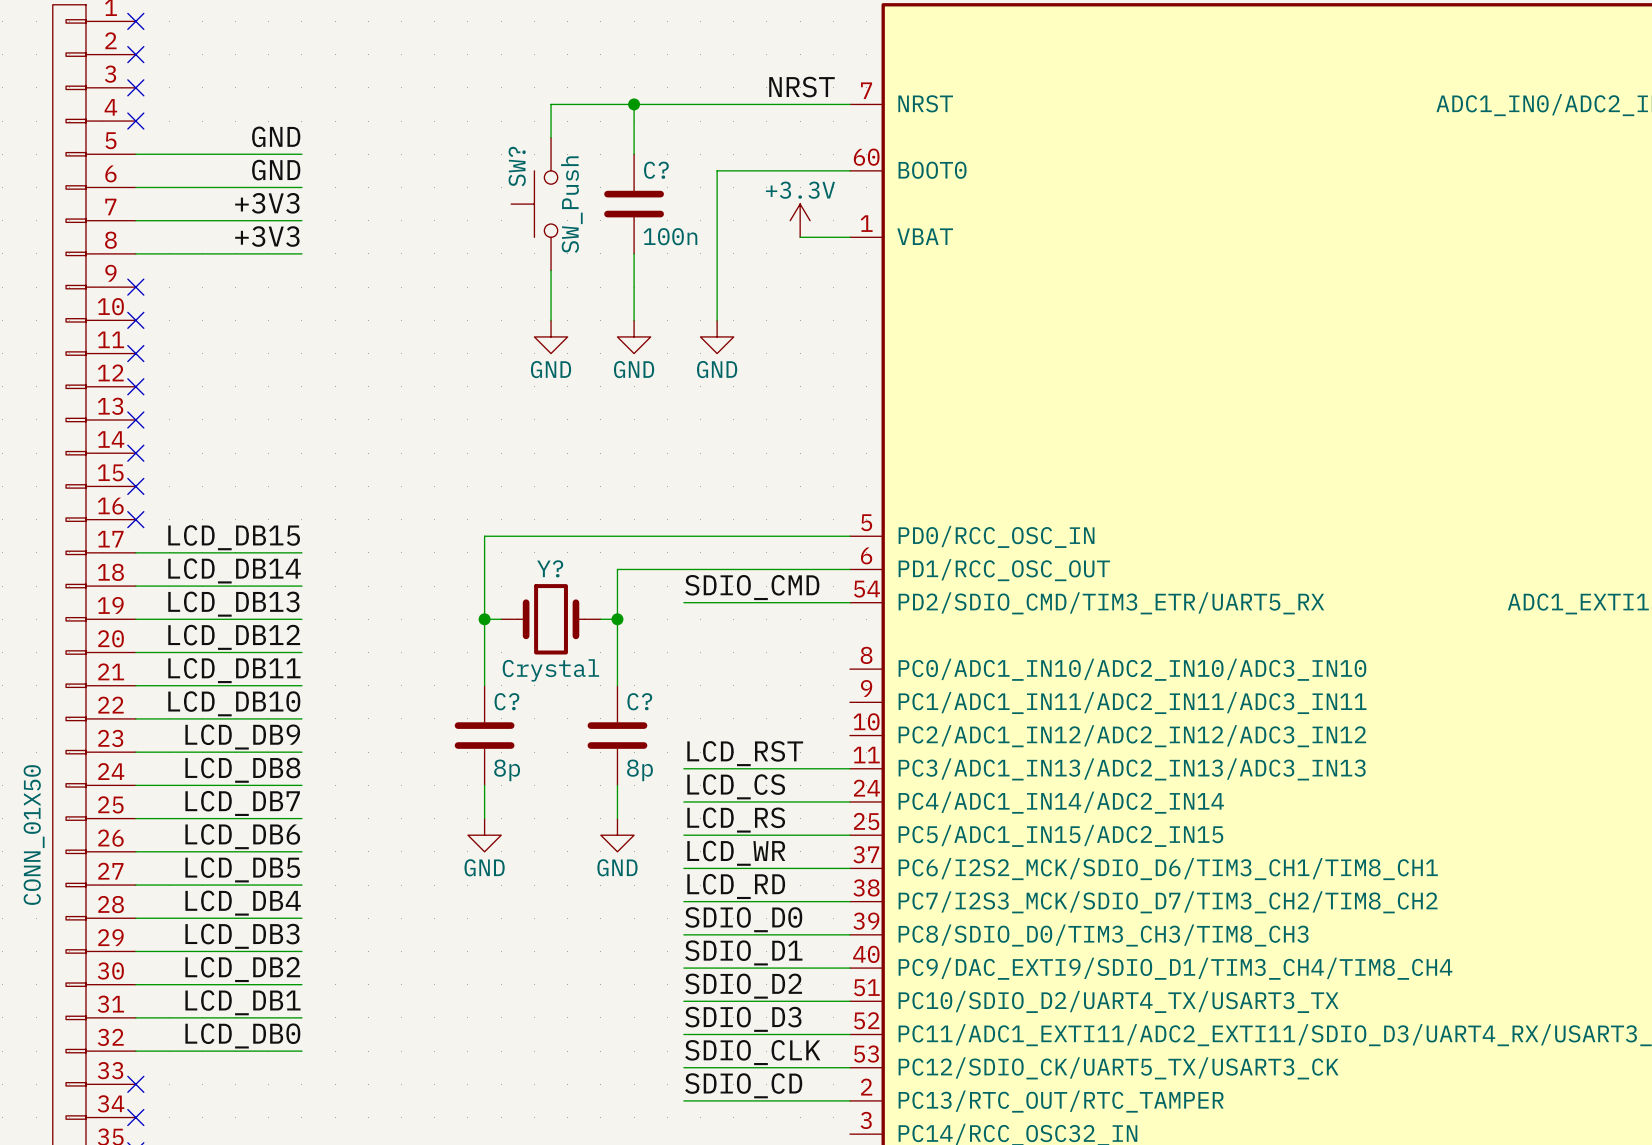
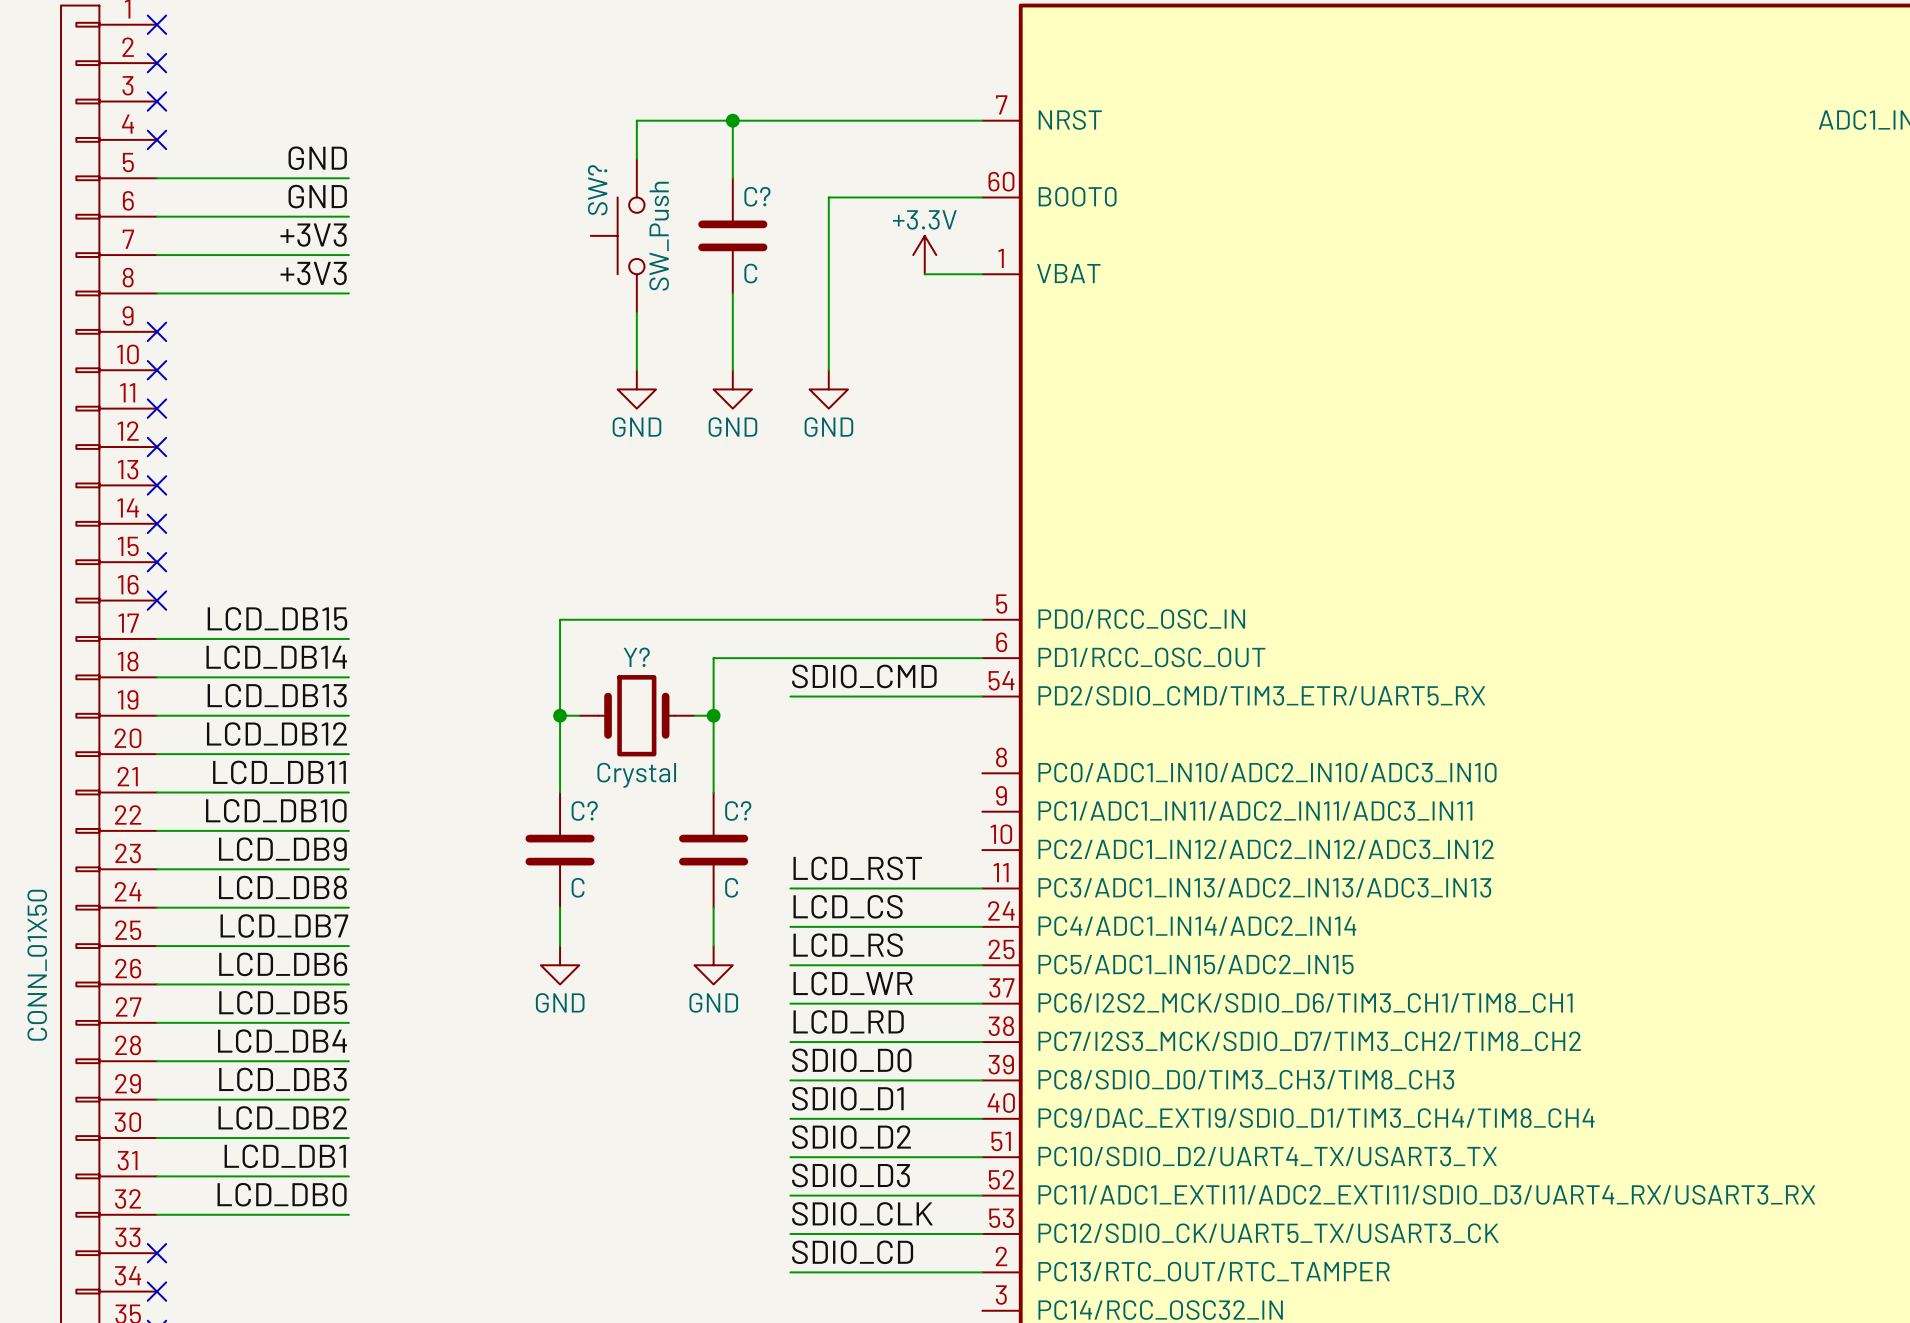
label: NRST (801, 87) -> none
C? value: 100n (670, 236) -> C (750, 273)
C? value: 8p (507, 770) -> C (578, 887)
C? value: 8p (639, 770) -> C (731, 887)

